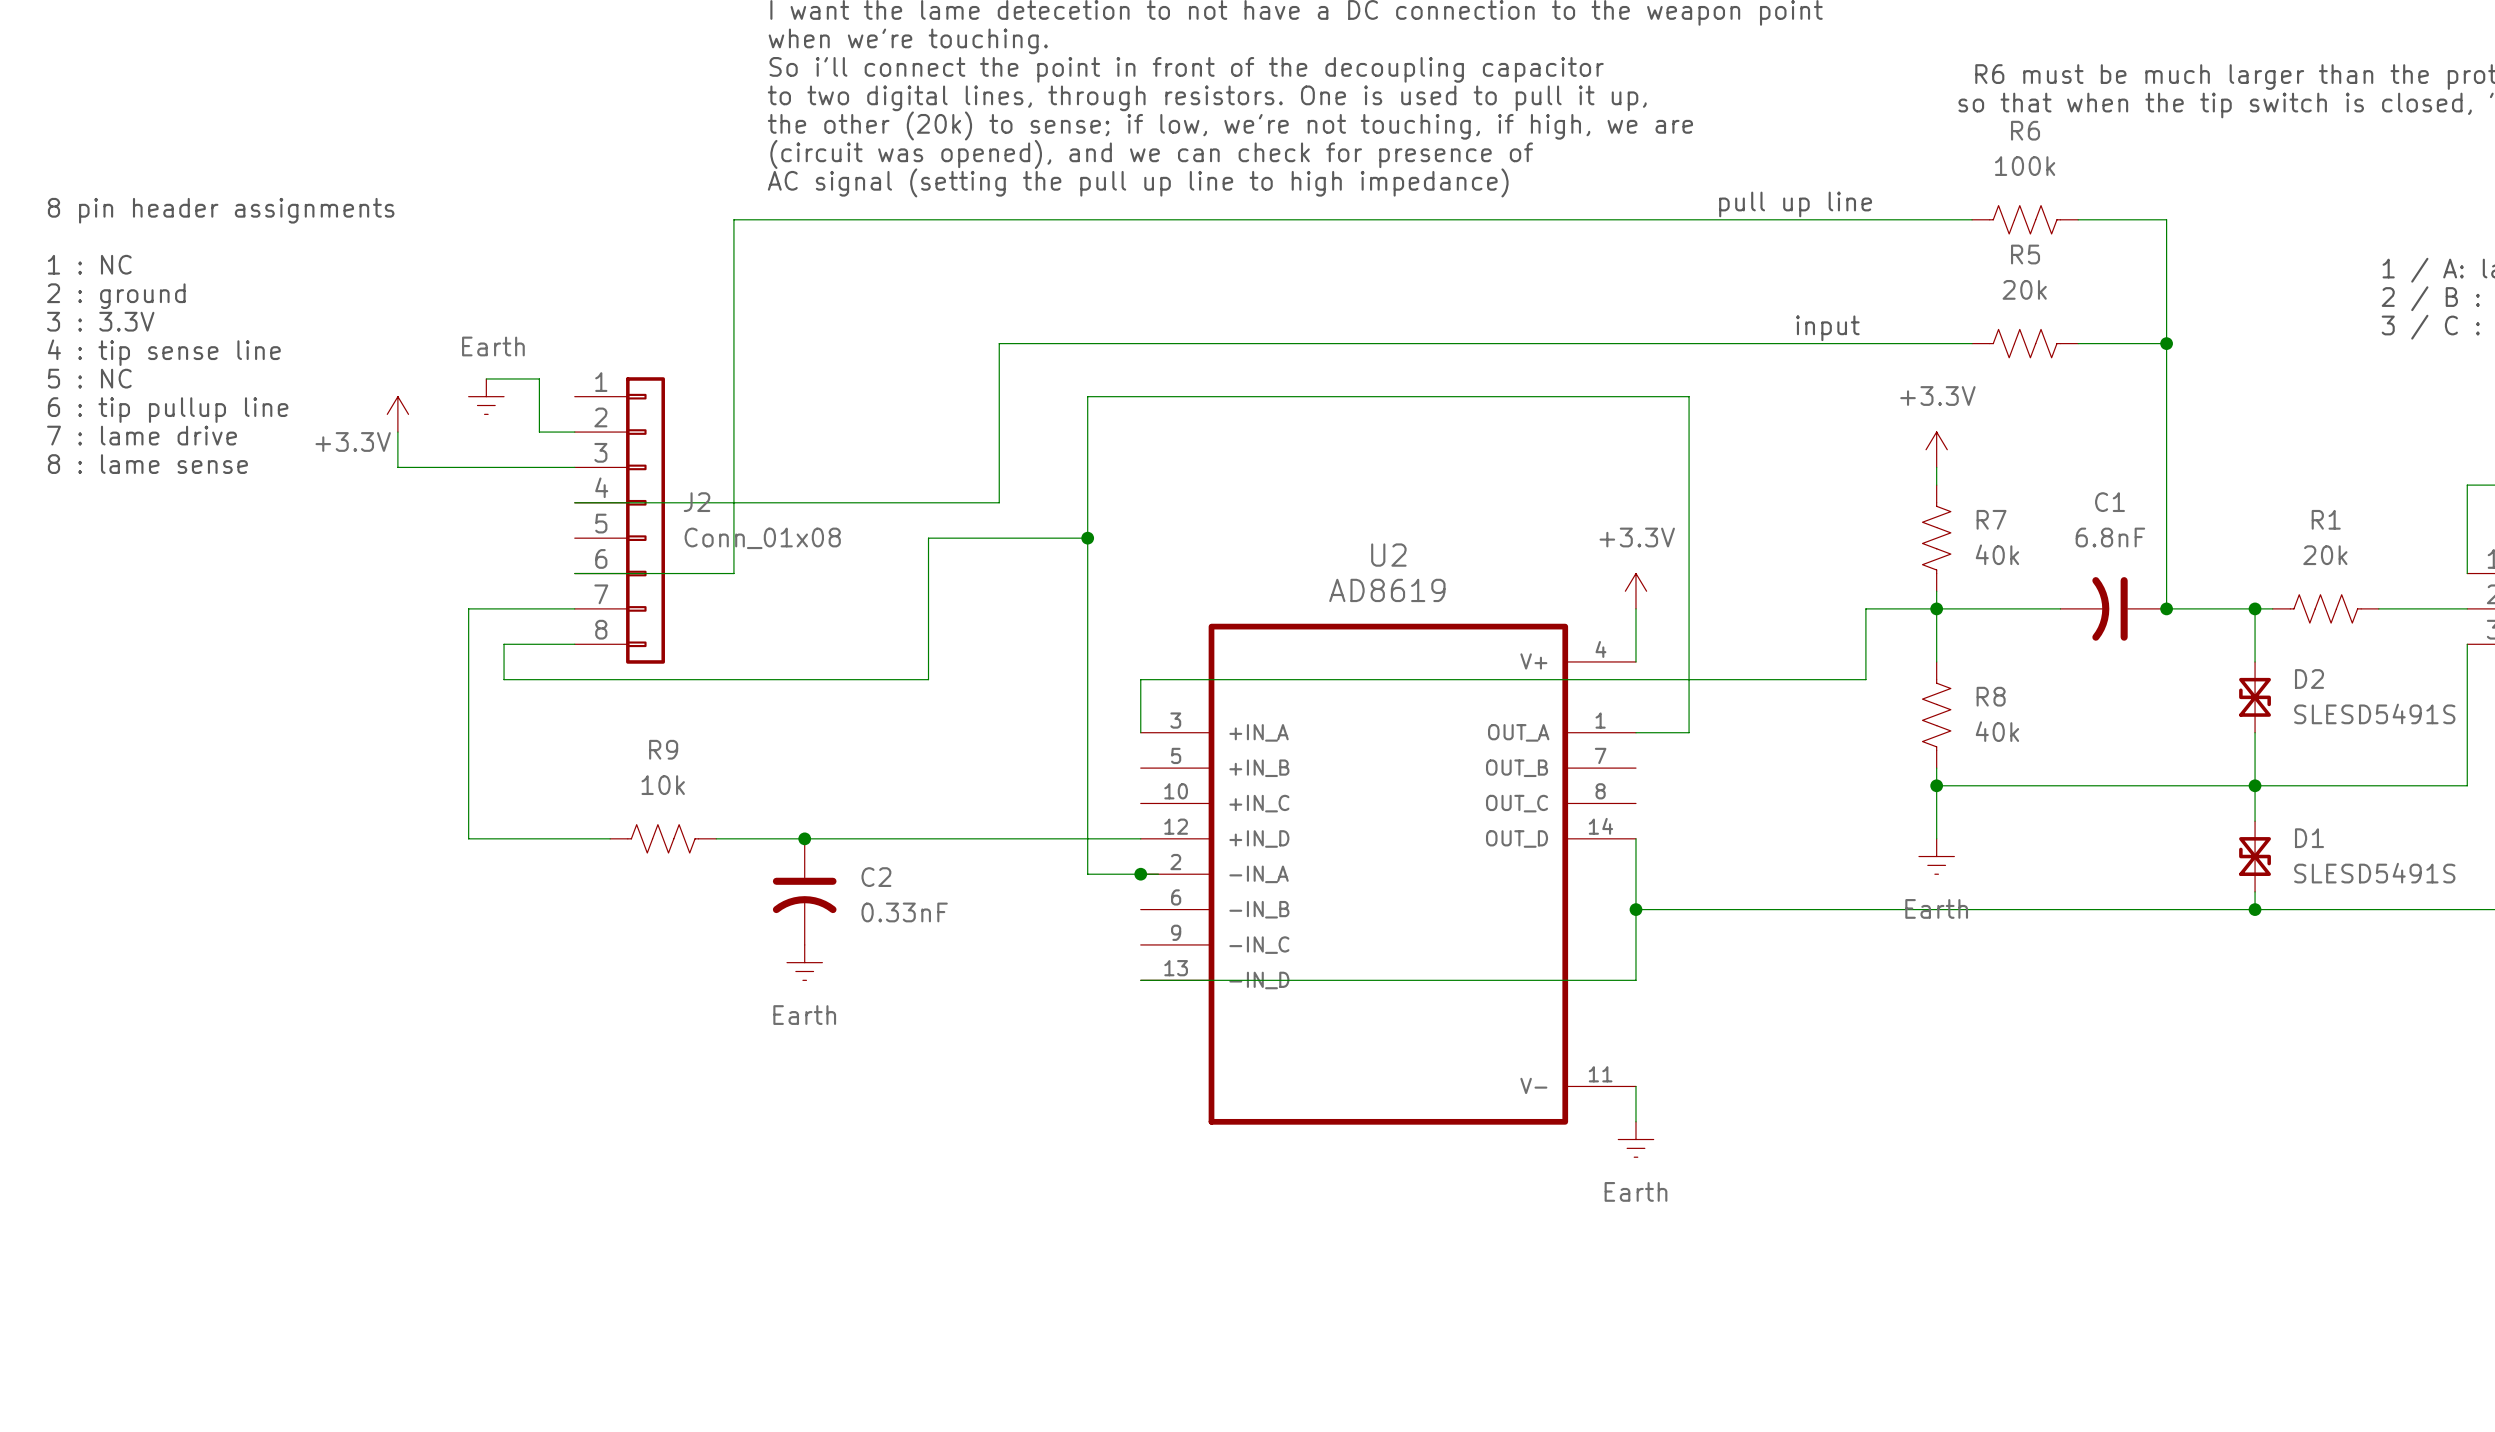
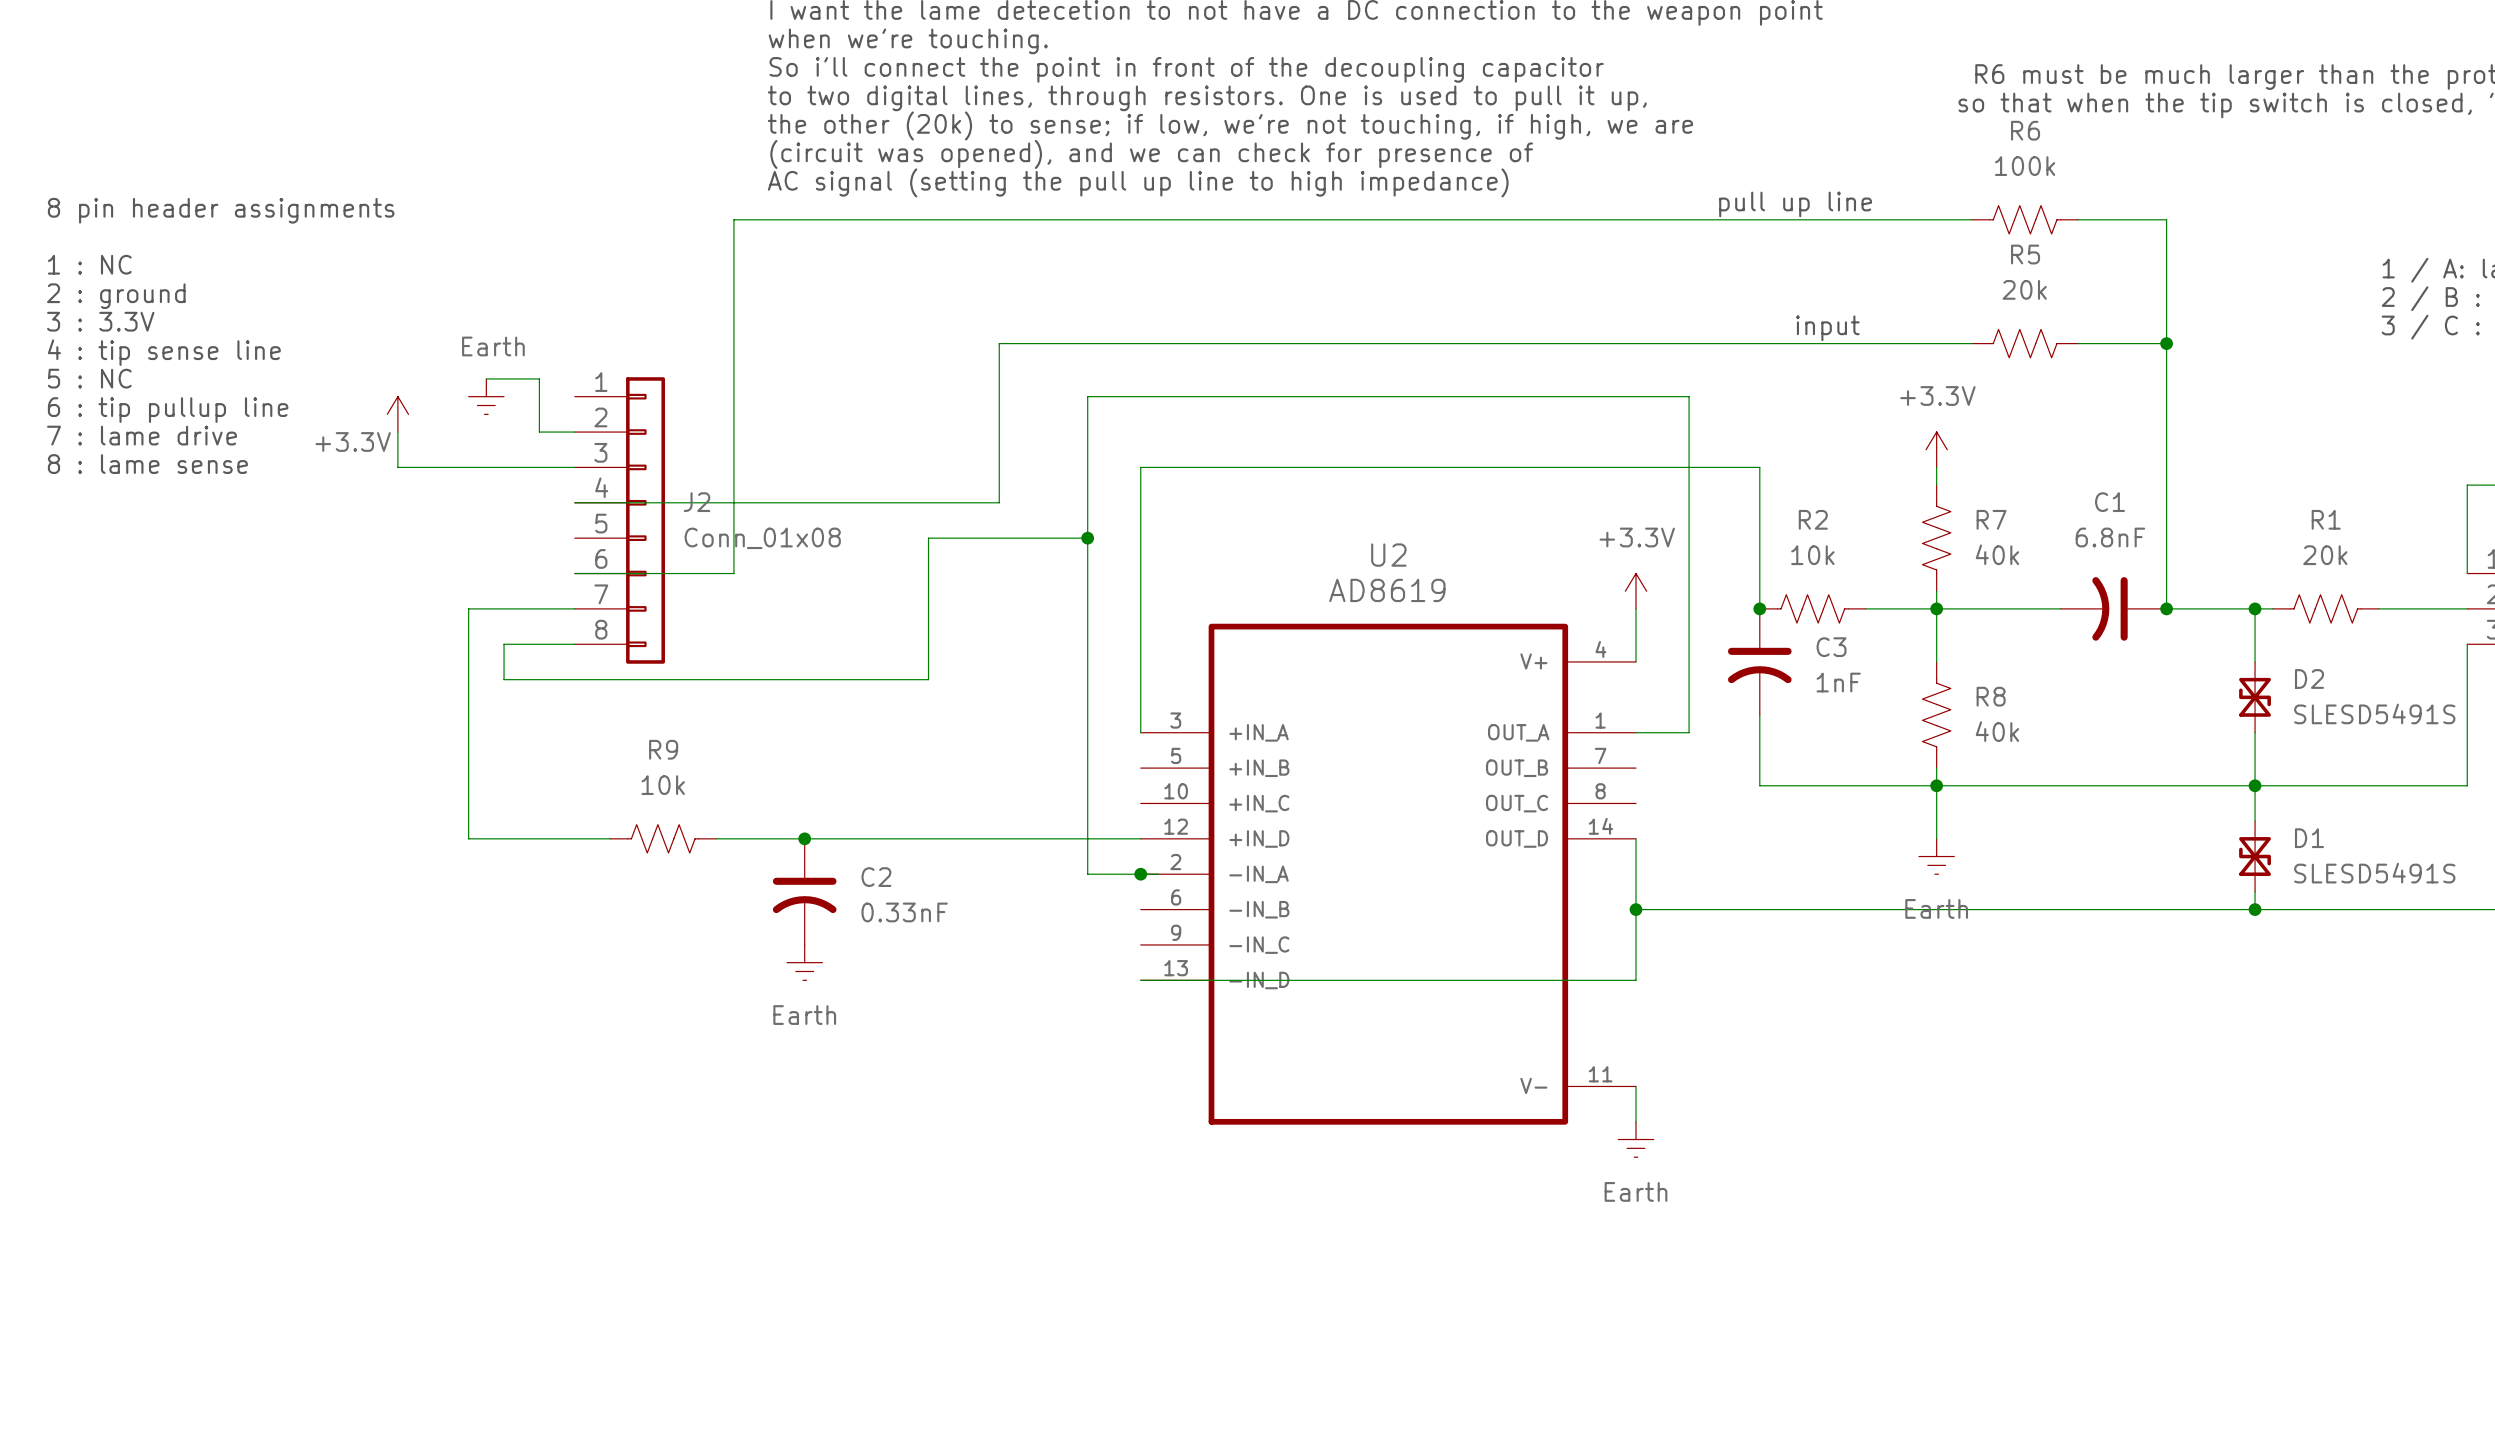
junction: none -> (1759, 608)
R2: none -> 10k (1812, 608)
wire: (1865, 608) (1865, 679) (1140, 679) -> (1759, 608) (1759, 467) (1140, 467) (1140, 679)
C3: none -> 1nF (1759, 661)
wire: none -> (1759, 715) (1759, 785) (1936, 785)

